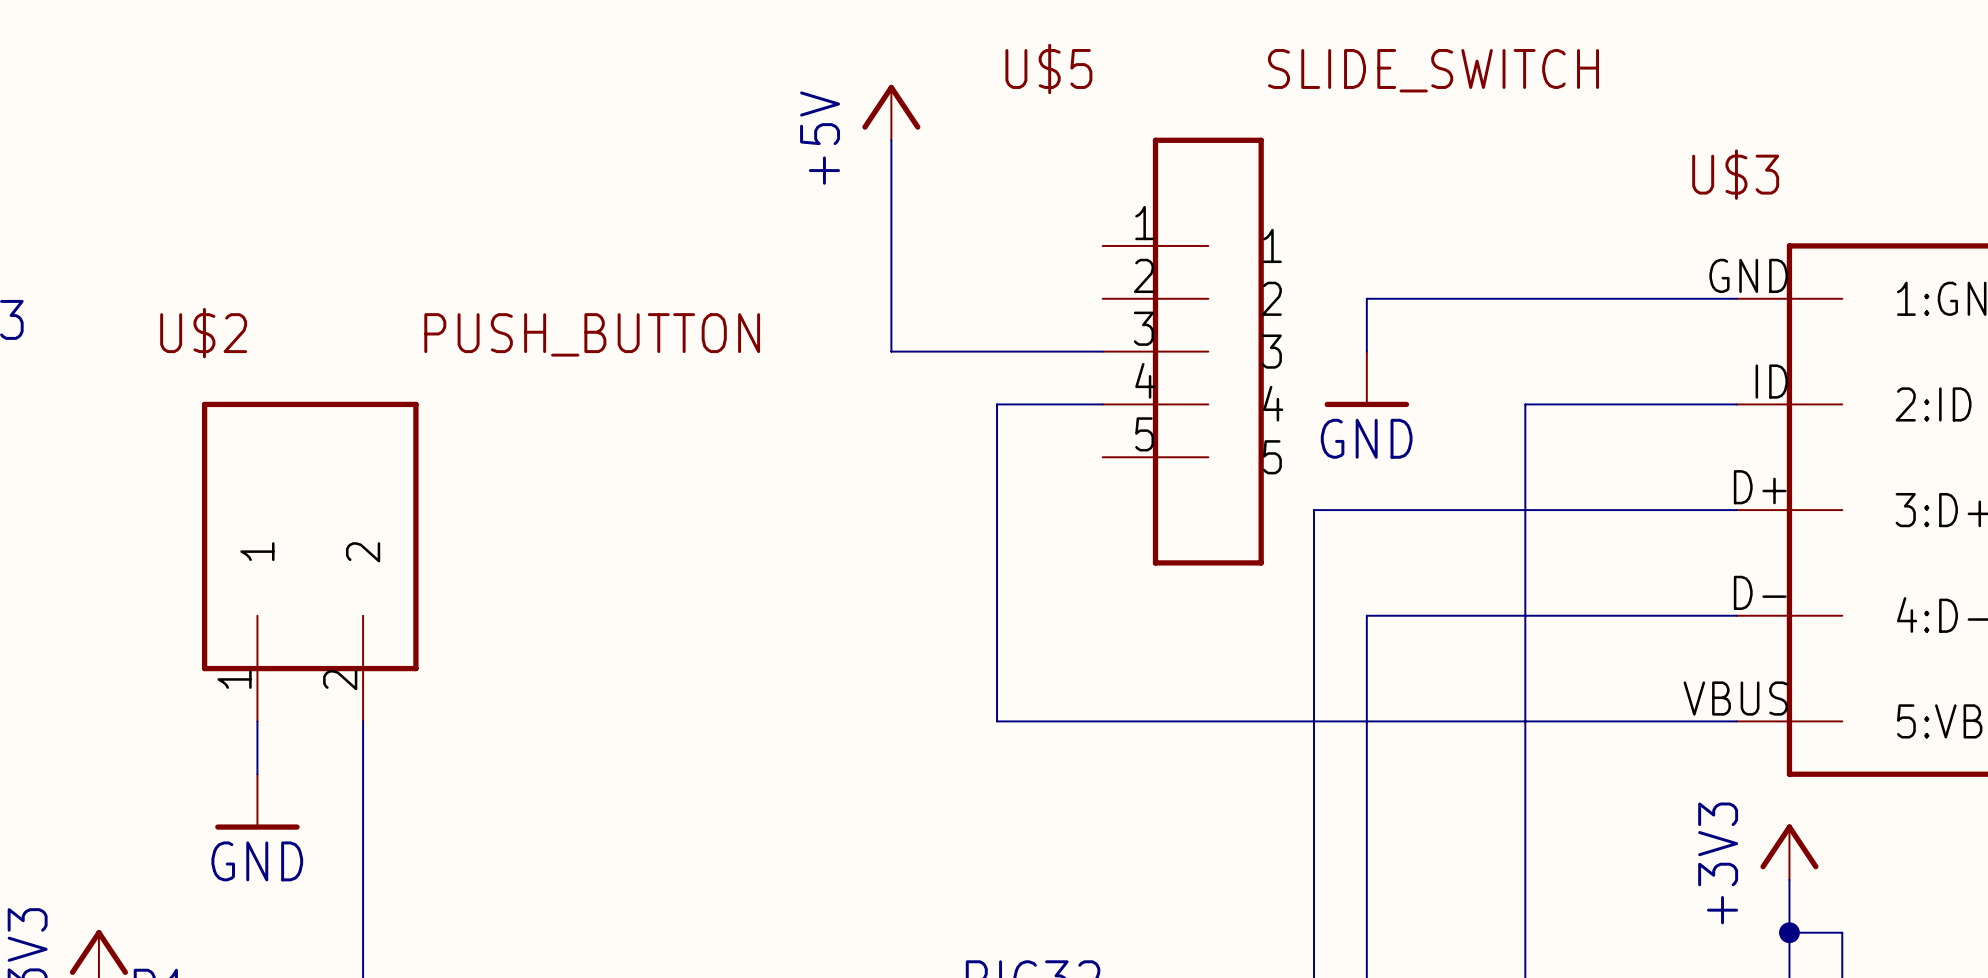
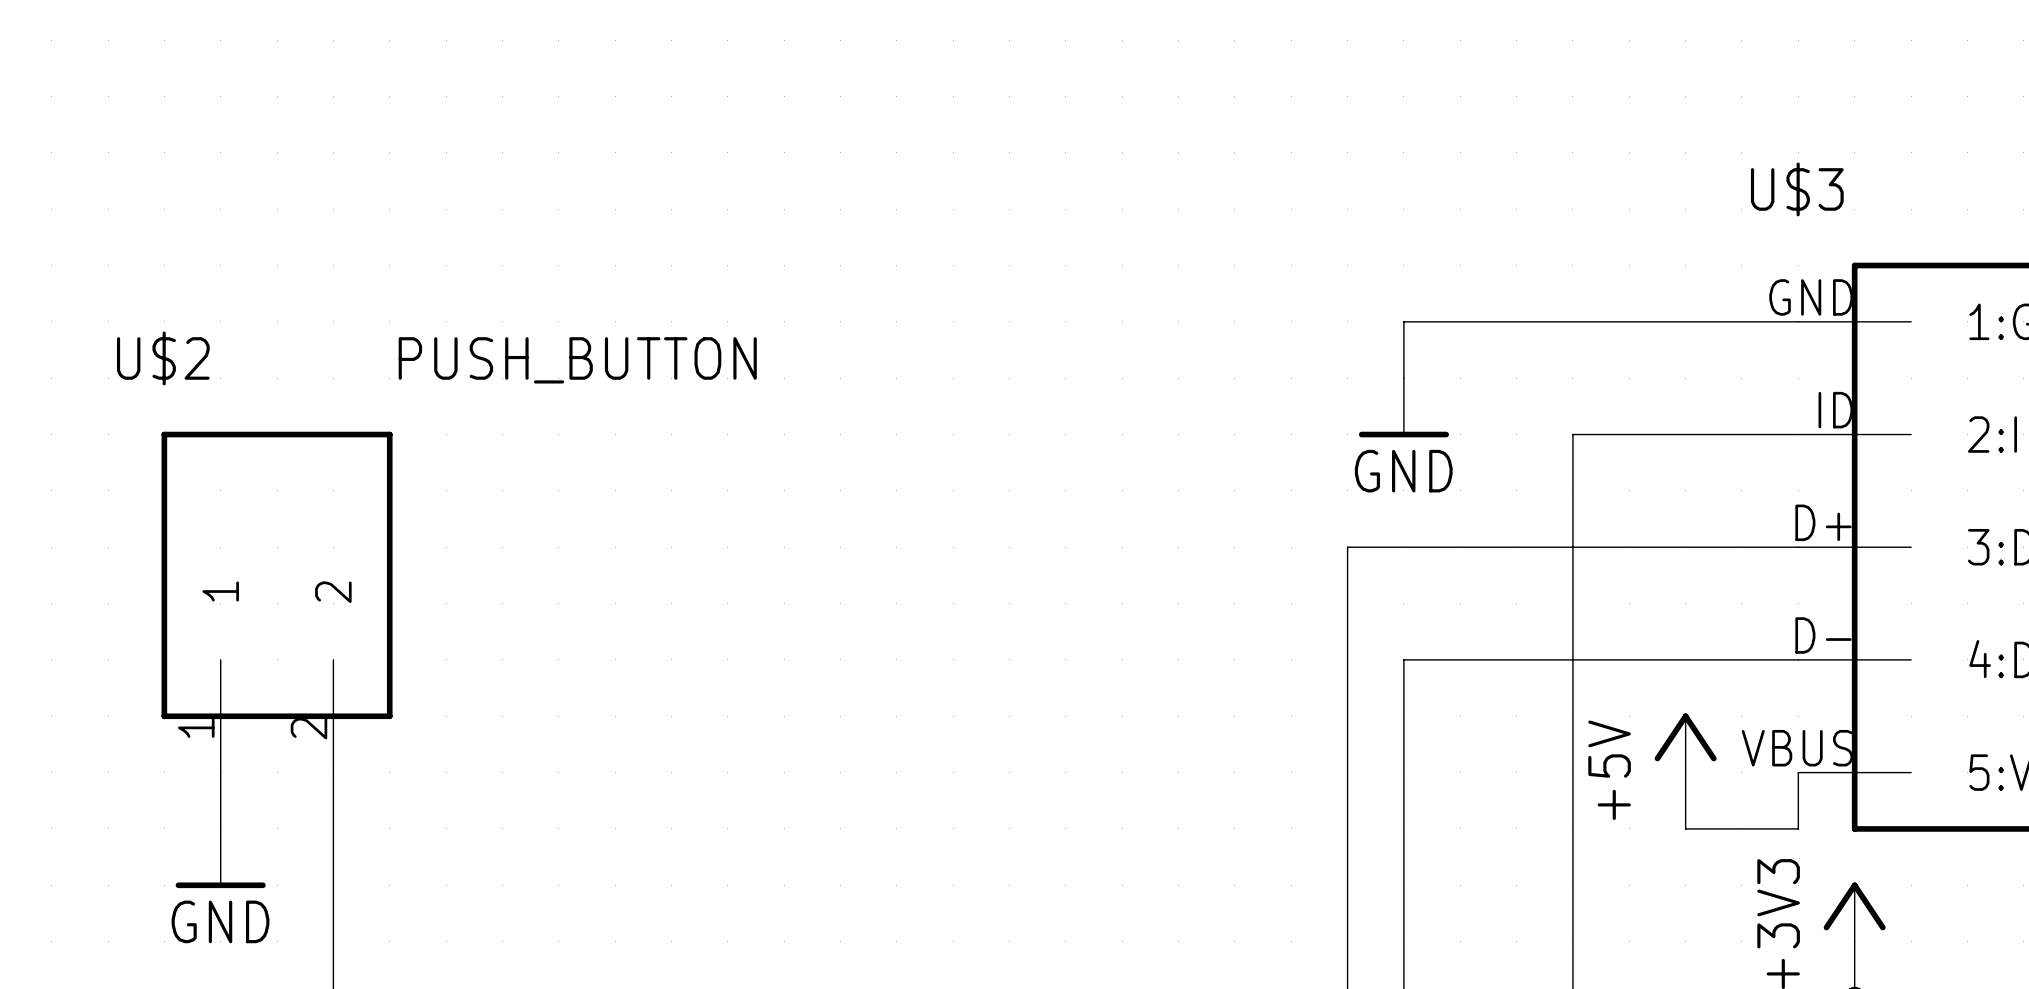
power symbol: +5V (891, 112) -> none
wire: (891, 140) (891, 351) (1102, 351) -> none
U$5: SLIDE_SWITCH (1183, 351) -> none
wire: (1102, 404) (997, 404) (997, 721) (1736, 721) -> (1685, 772) (1685, 828) (1798, 828) (1798, 772)
power symbol: none -> +5V (1685, 743)

